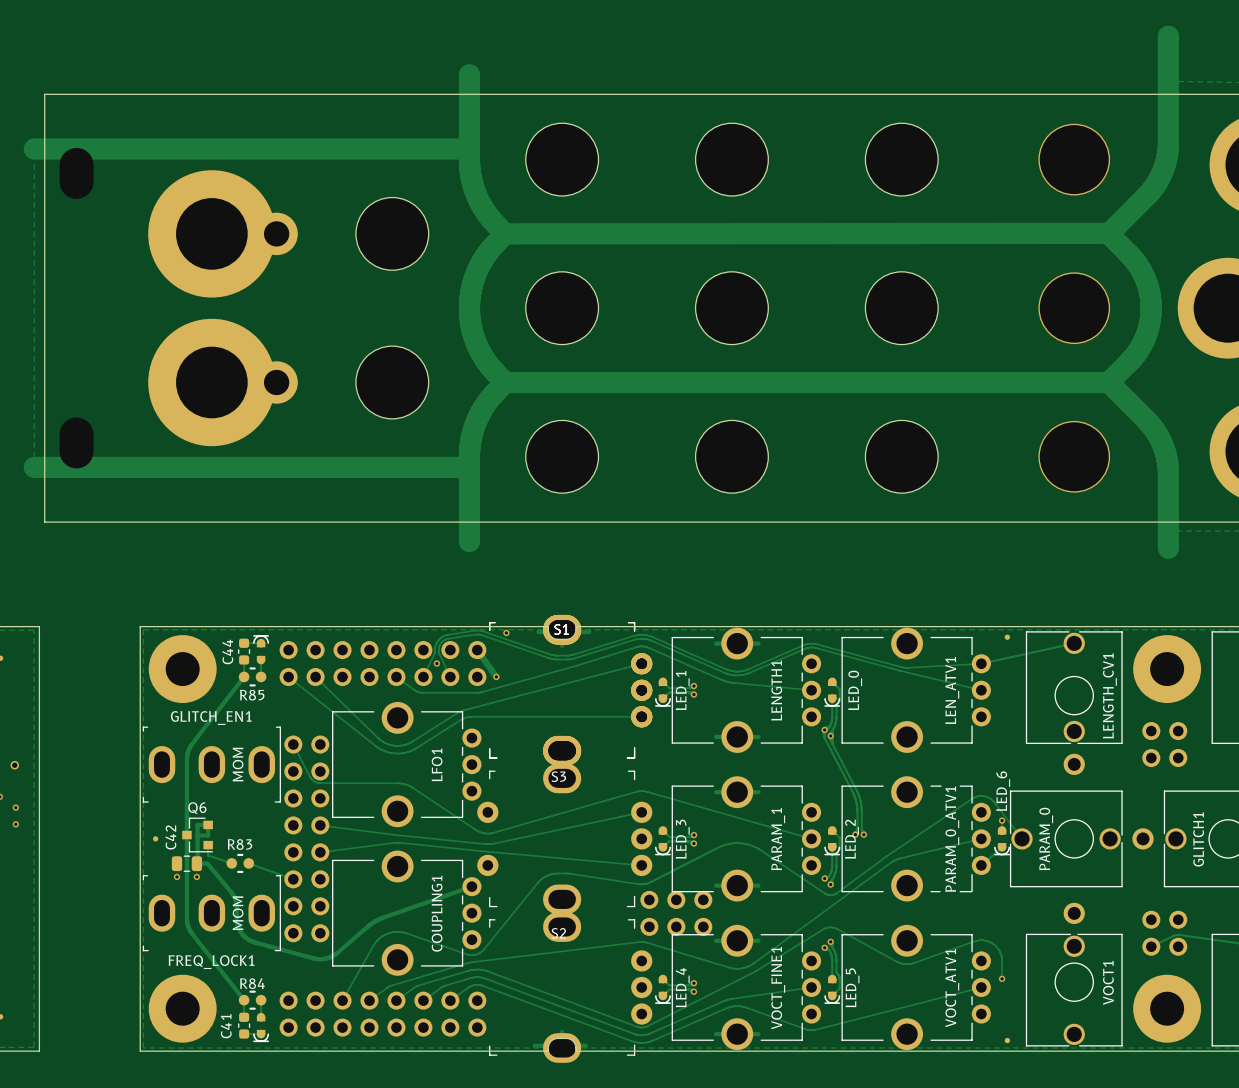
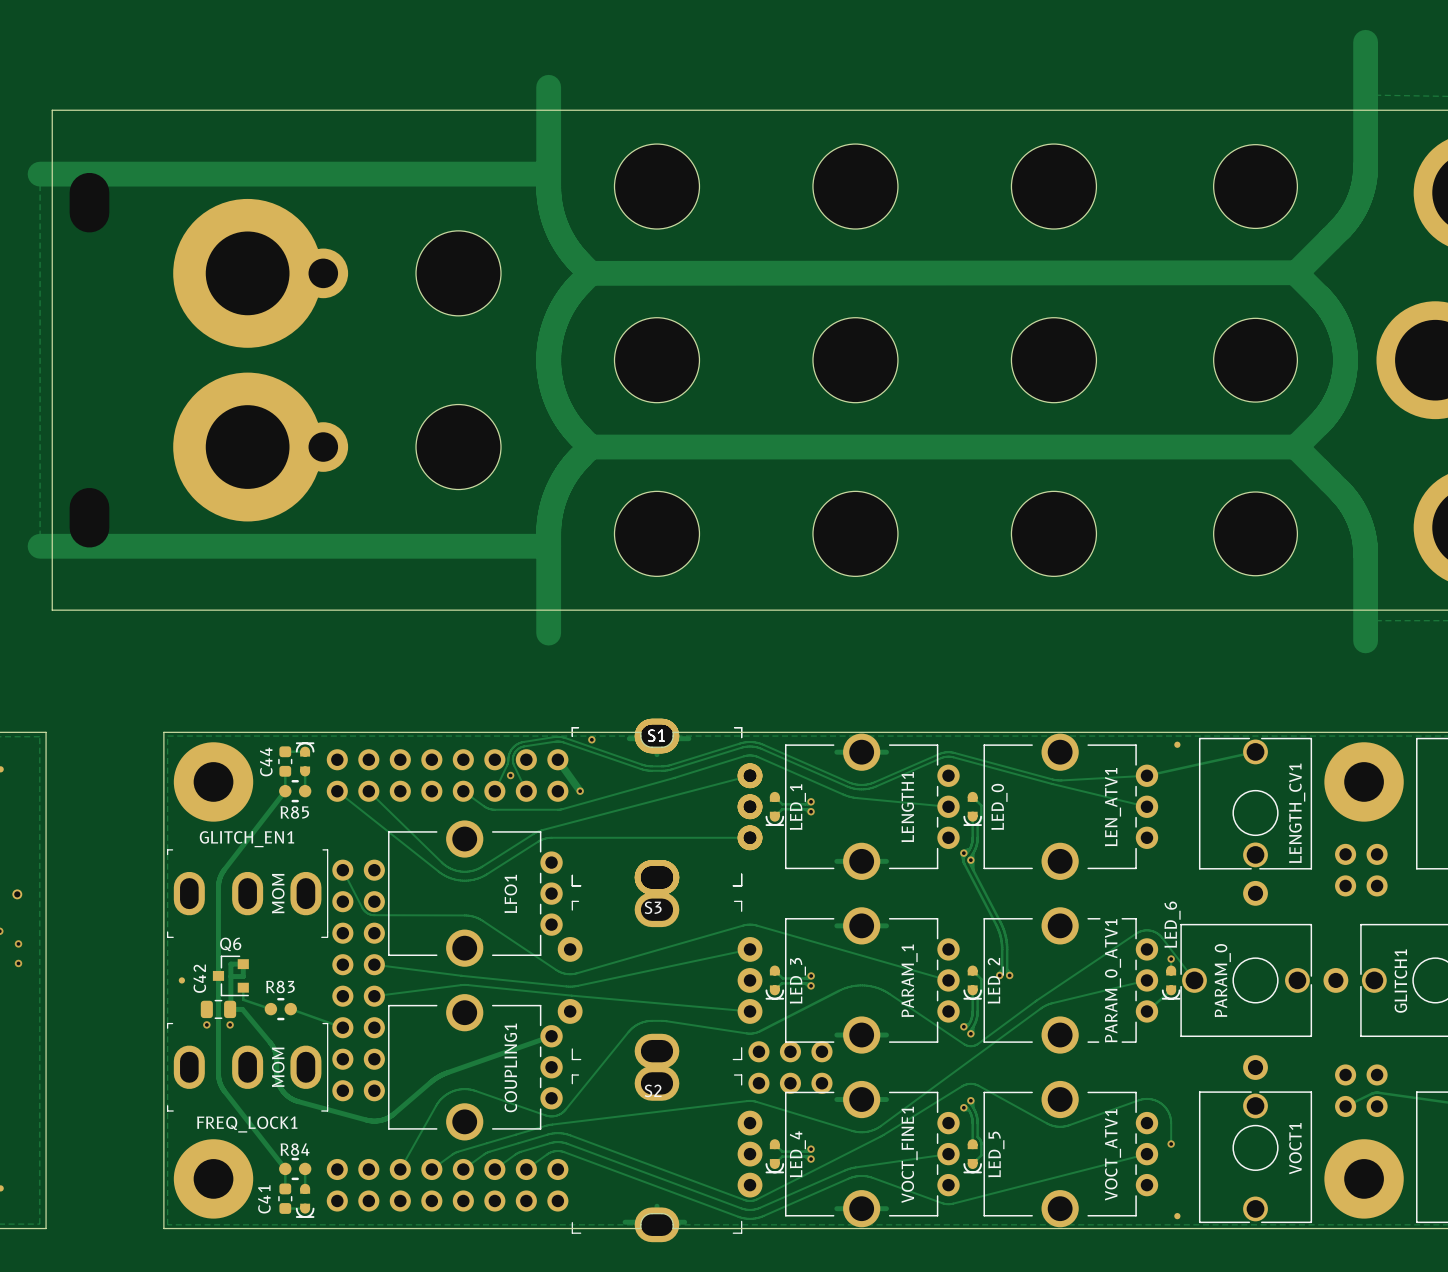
part footprint: [1038, 123, 1111, 196] -> [1213, 144, 1298, 229]
part footprint: [1038, 272, 1111, 345] -> [1213, 318, 1298, 403]
part footprint: [1038, 420, 1111, 493] -> [1213, 492, 1298, 576]

